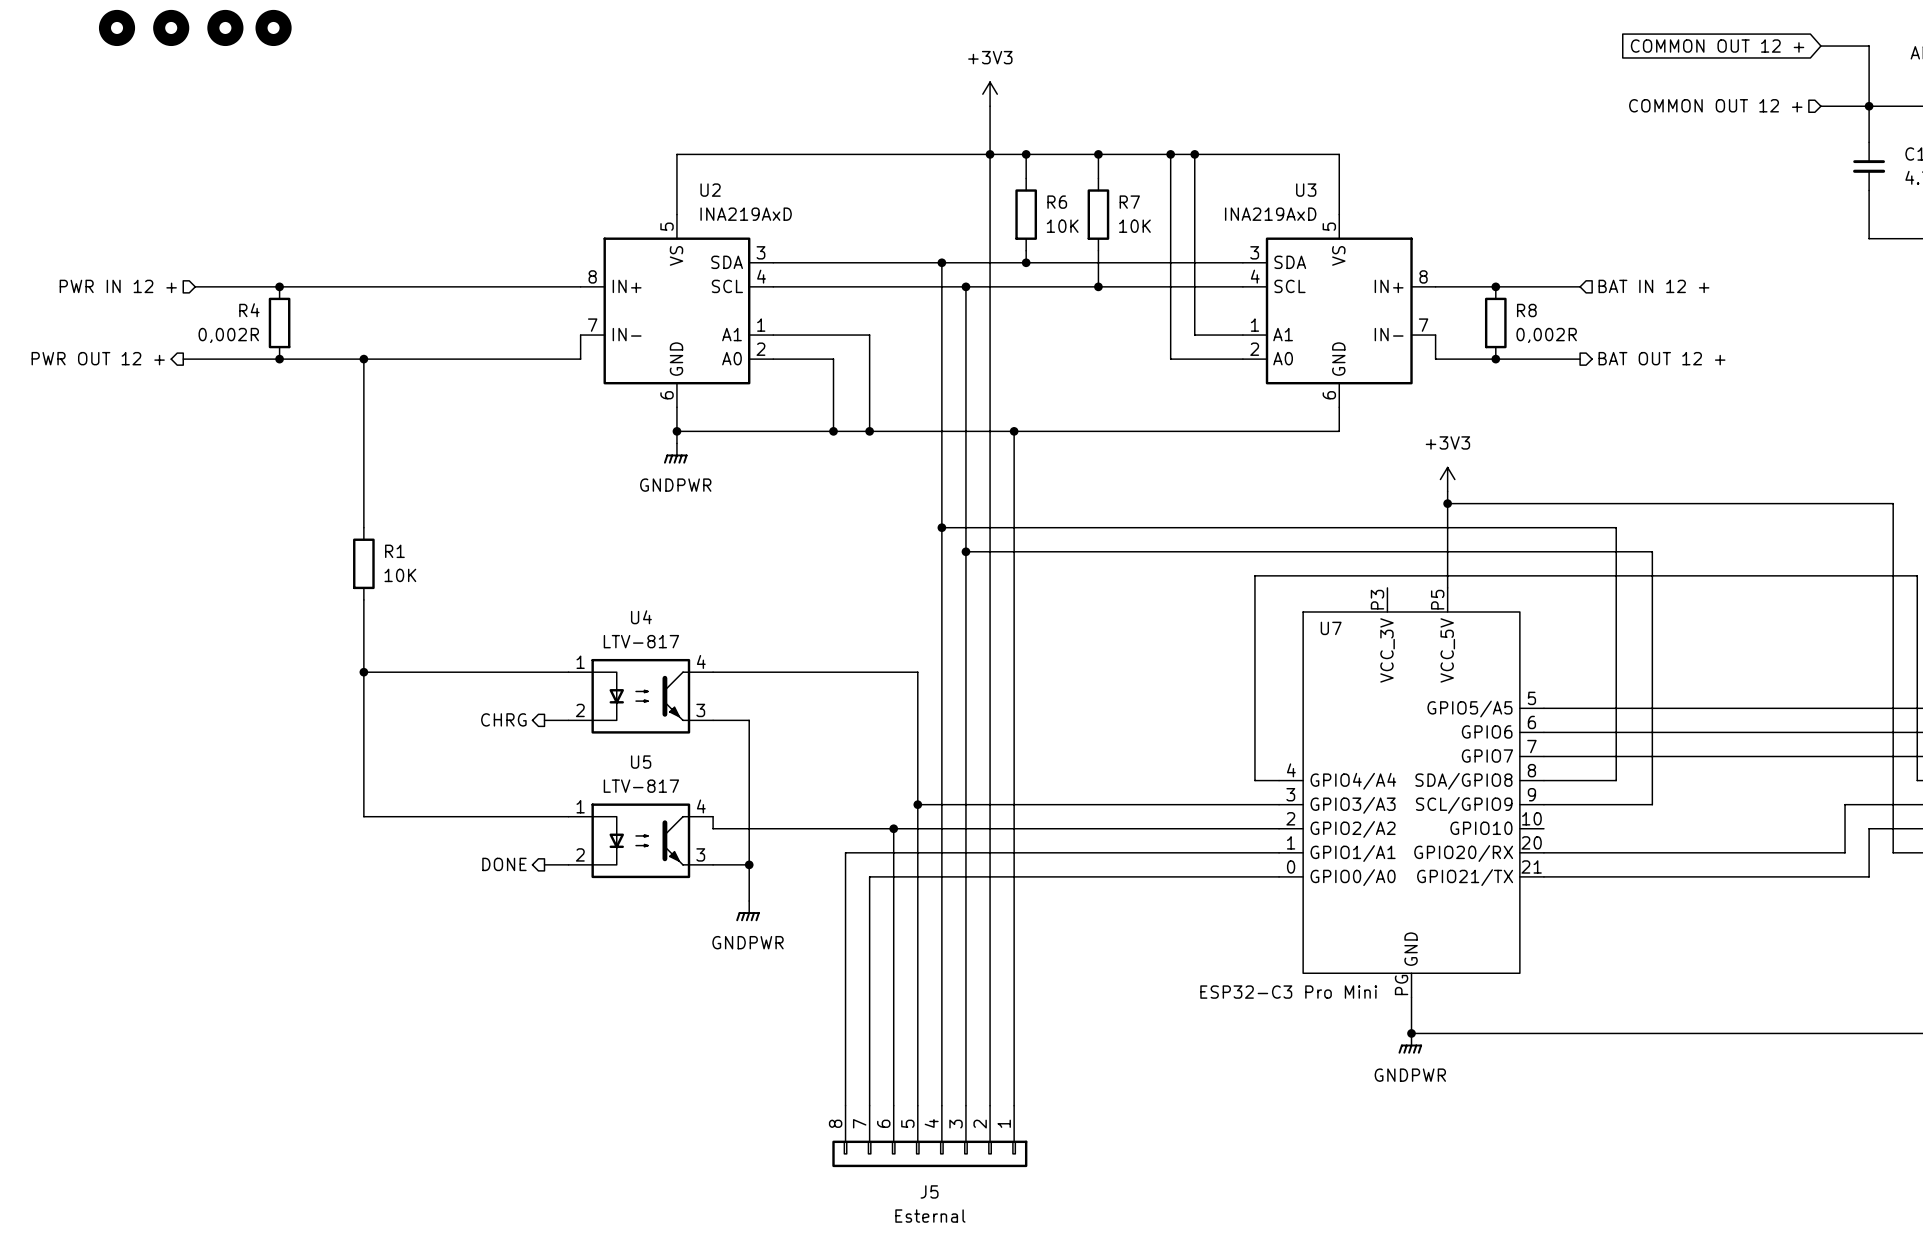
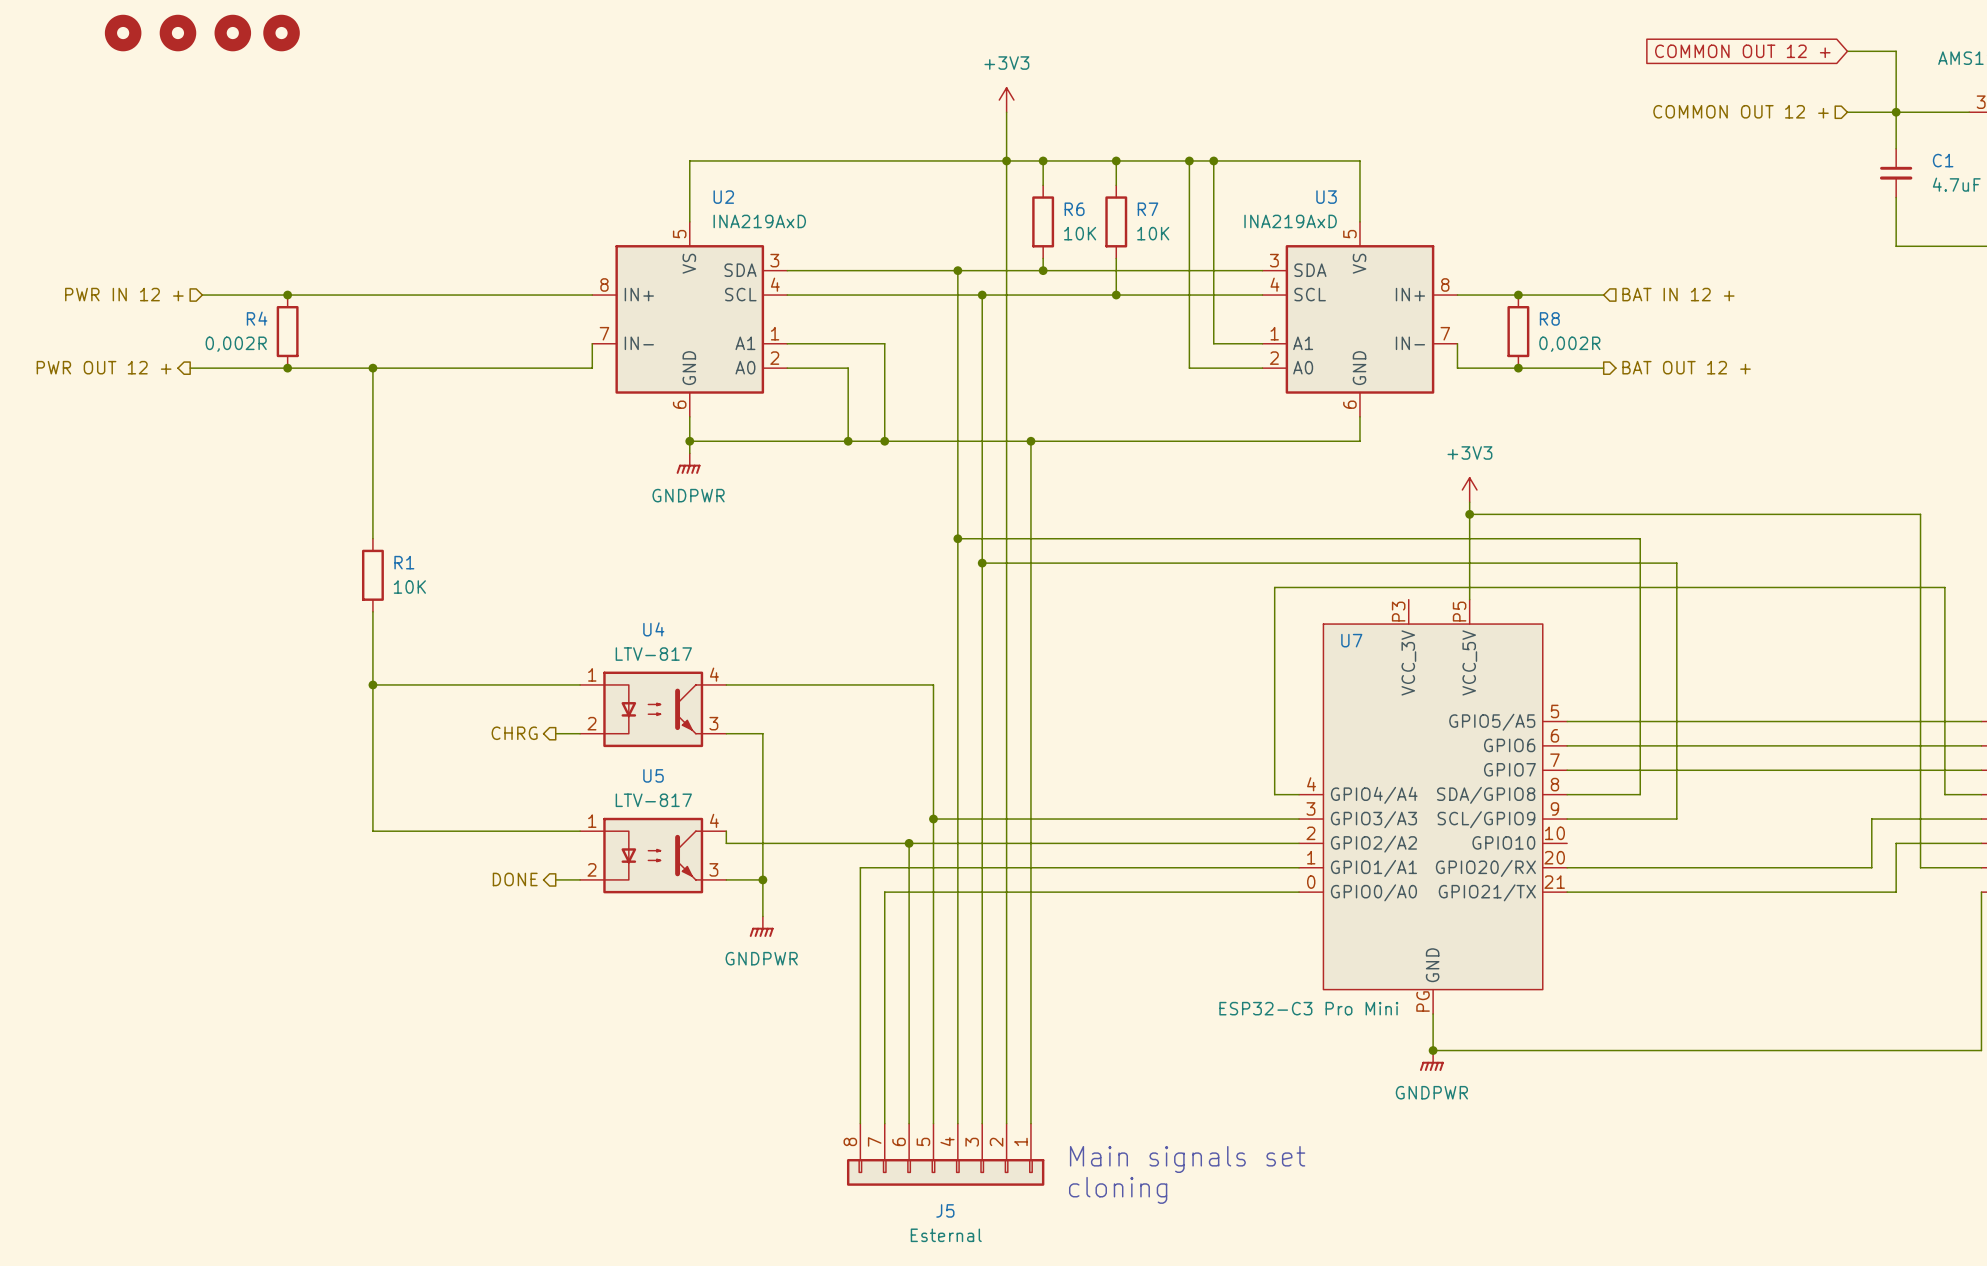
text: none -> Main signals set (1187, 1159)
text: none -> cloning (1118, 1190)

